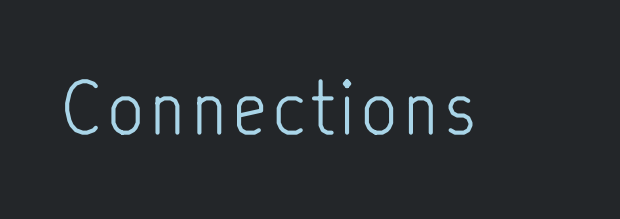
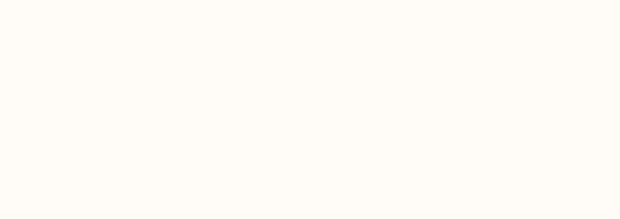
text: Connections (268, 106) -> none

